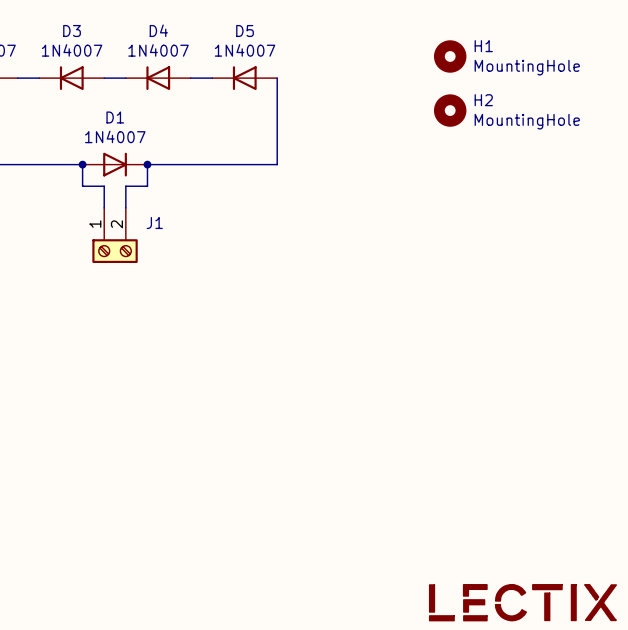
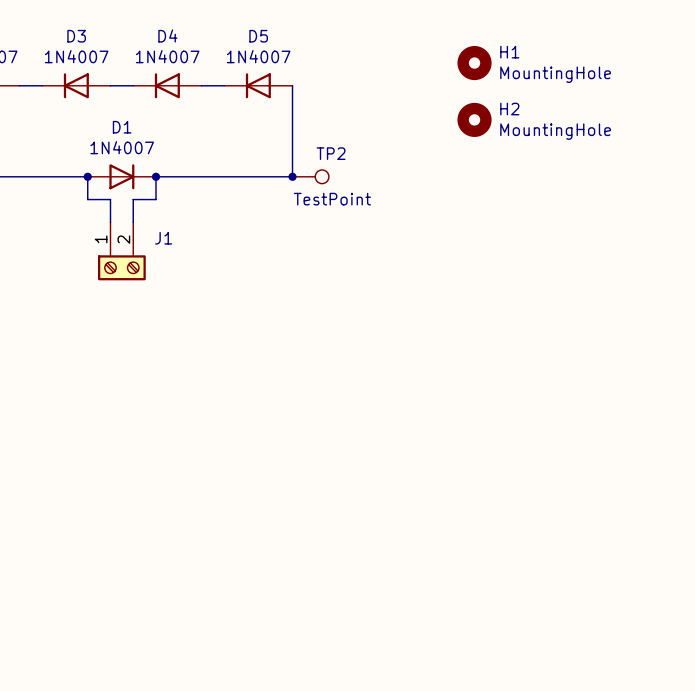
junction: none -> (292, 176)
TP2: none -> TestPoint (310, 176)
part: (522, 602) -> none

